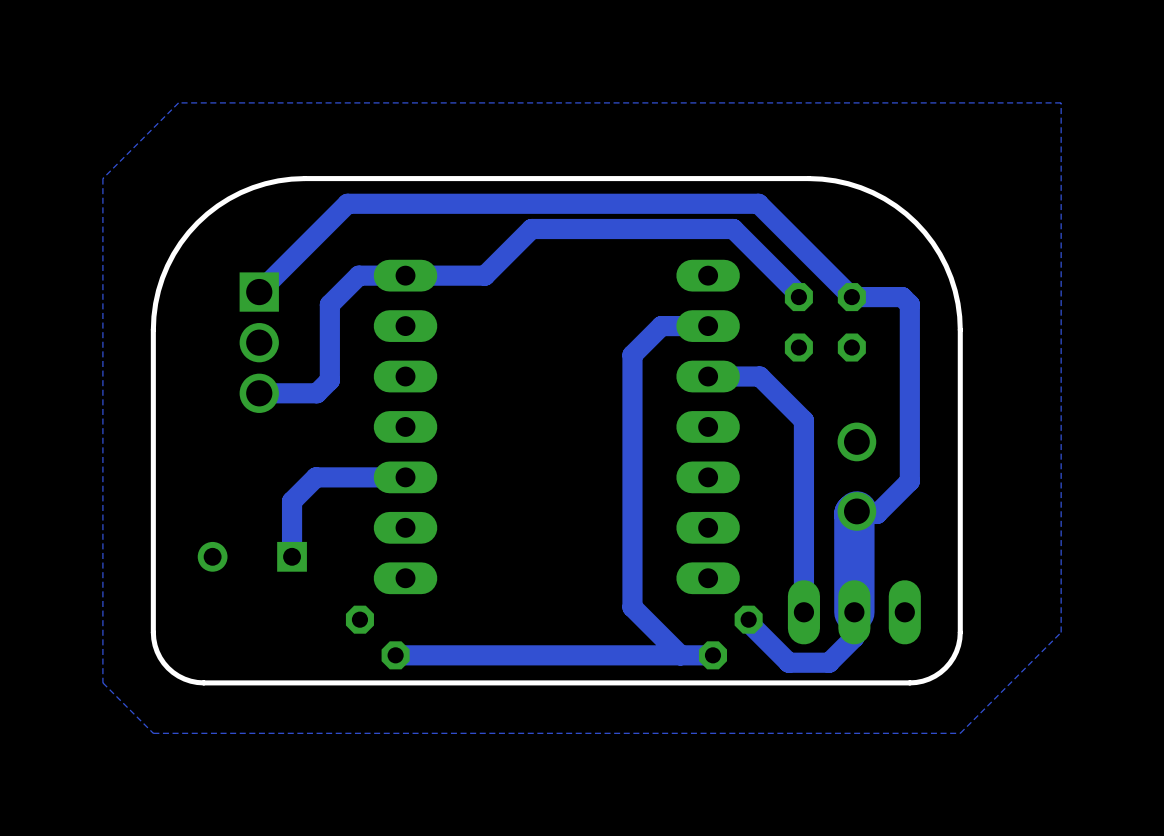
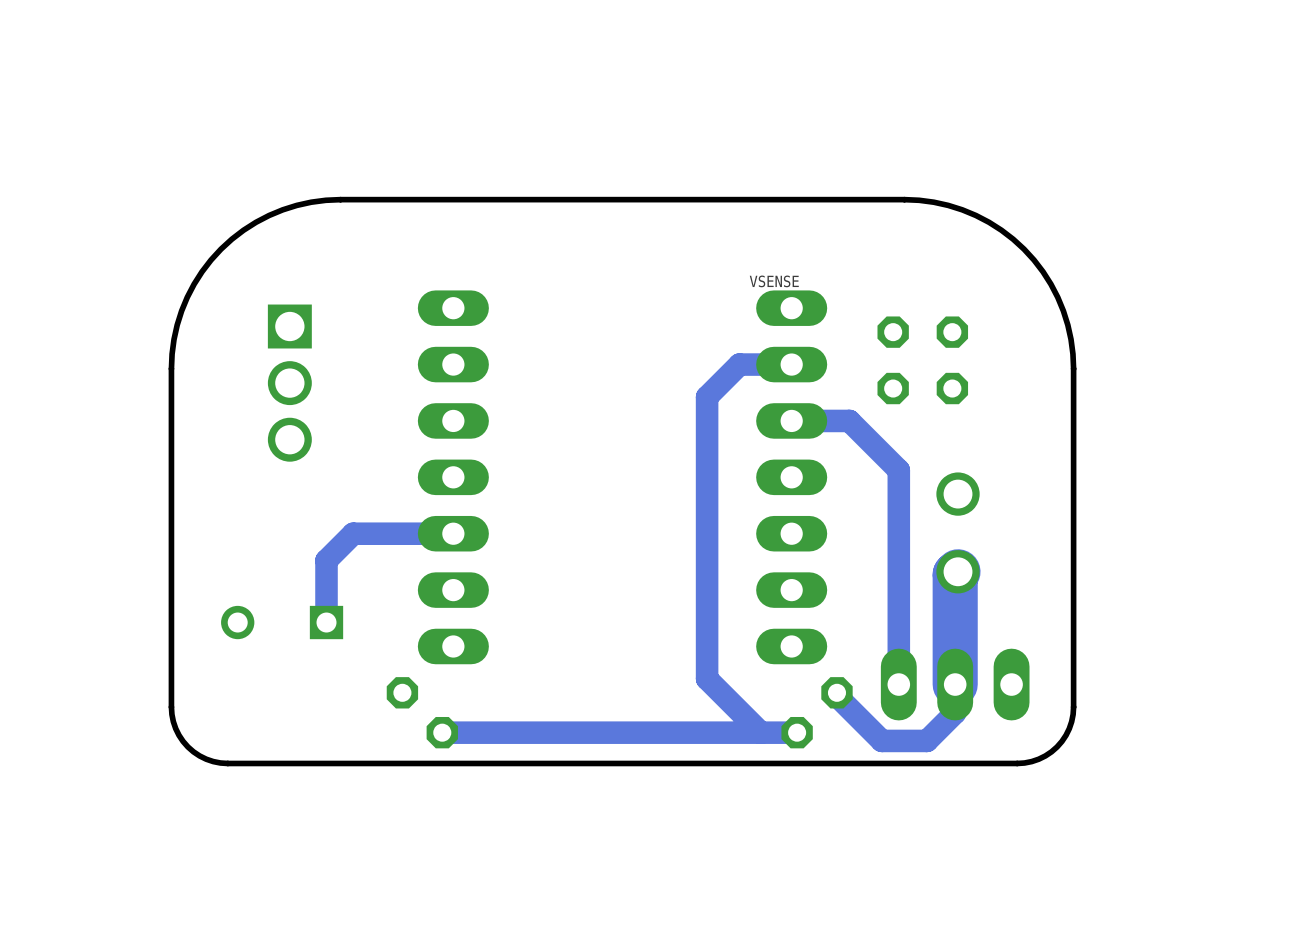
bottom zone outline: (1061, 102) (178, 102) (102, 178) (102, 682) (153, 733) (960, 733) (1061, 632) (1061, 102) -> none
text: none -> VSENSE (774, 281)
bottom track: (259, 292) (347, 203) (758, 203) (851, 297) (902, 297) (909, 304) (909, 481) (877, 513) (854, 513) -> none
bottom track: (798, 297) (798, 294) (733, 229) (531, 229) (484, 275) (358, 275) (329, 304) (329, 380) (316, 393) (259, 393) -> none

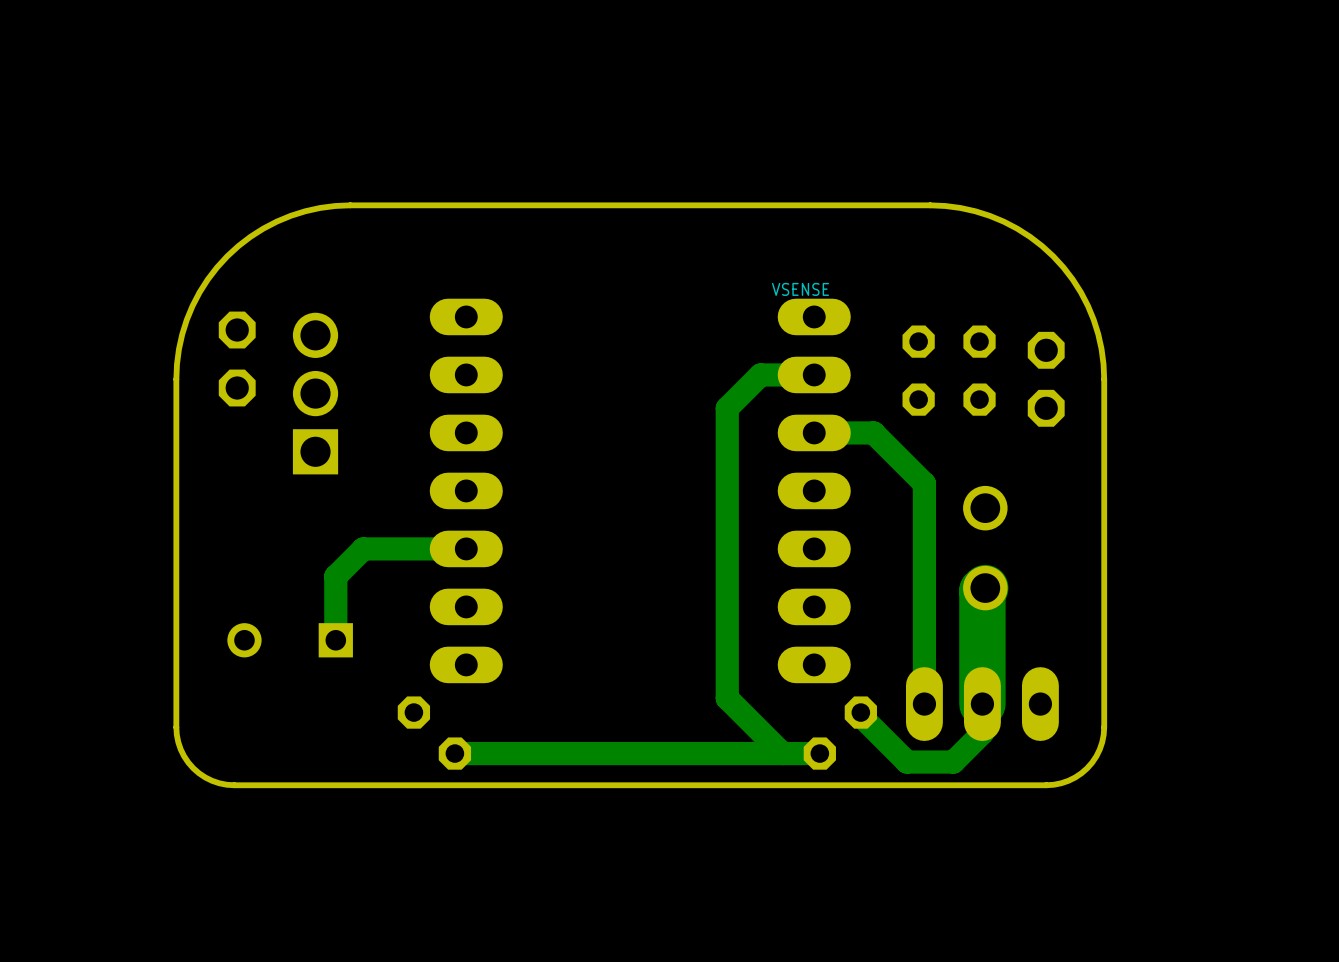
part: none -> (237, 330)
part: none -> (1046, 350)
part: none -> (237, 388)
part rotation: 0° (289, 383) -> 180° (315, 393)
part: none -> (1046, 408)

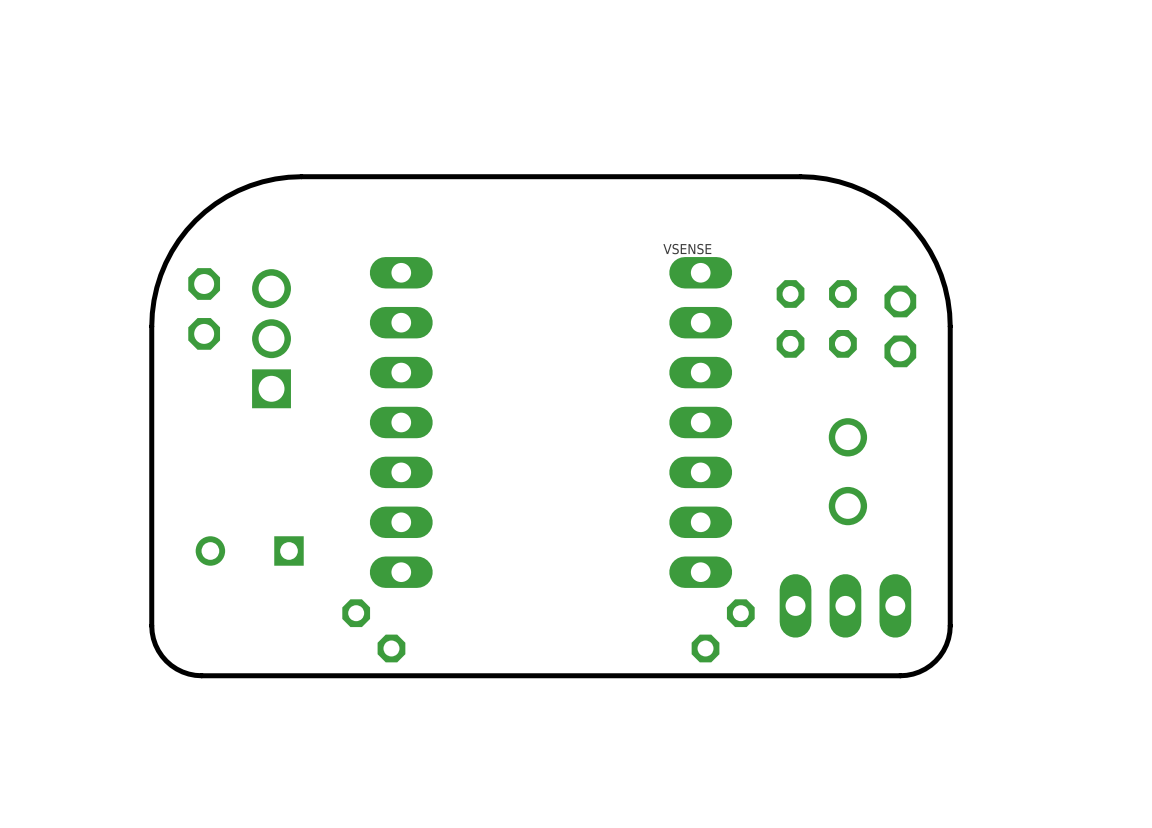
bottom track: (814, 374) (760, 374) (727, 408) (727, 698) (782, 753) -> none
bottom track: (814, 432) (873, 432) (924, 483) (924, 704) -> none
bottom track: (466, 548) (363, 548) (335, 576) (335, 640) -> none
bottom track: (985, 588) (982, 590) (982, 733) (953, 762) (907, 762) (860, 715) (860, 712) -> none
bottom track: (819, 753) (454, 753) -> none

